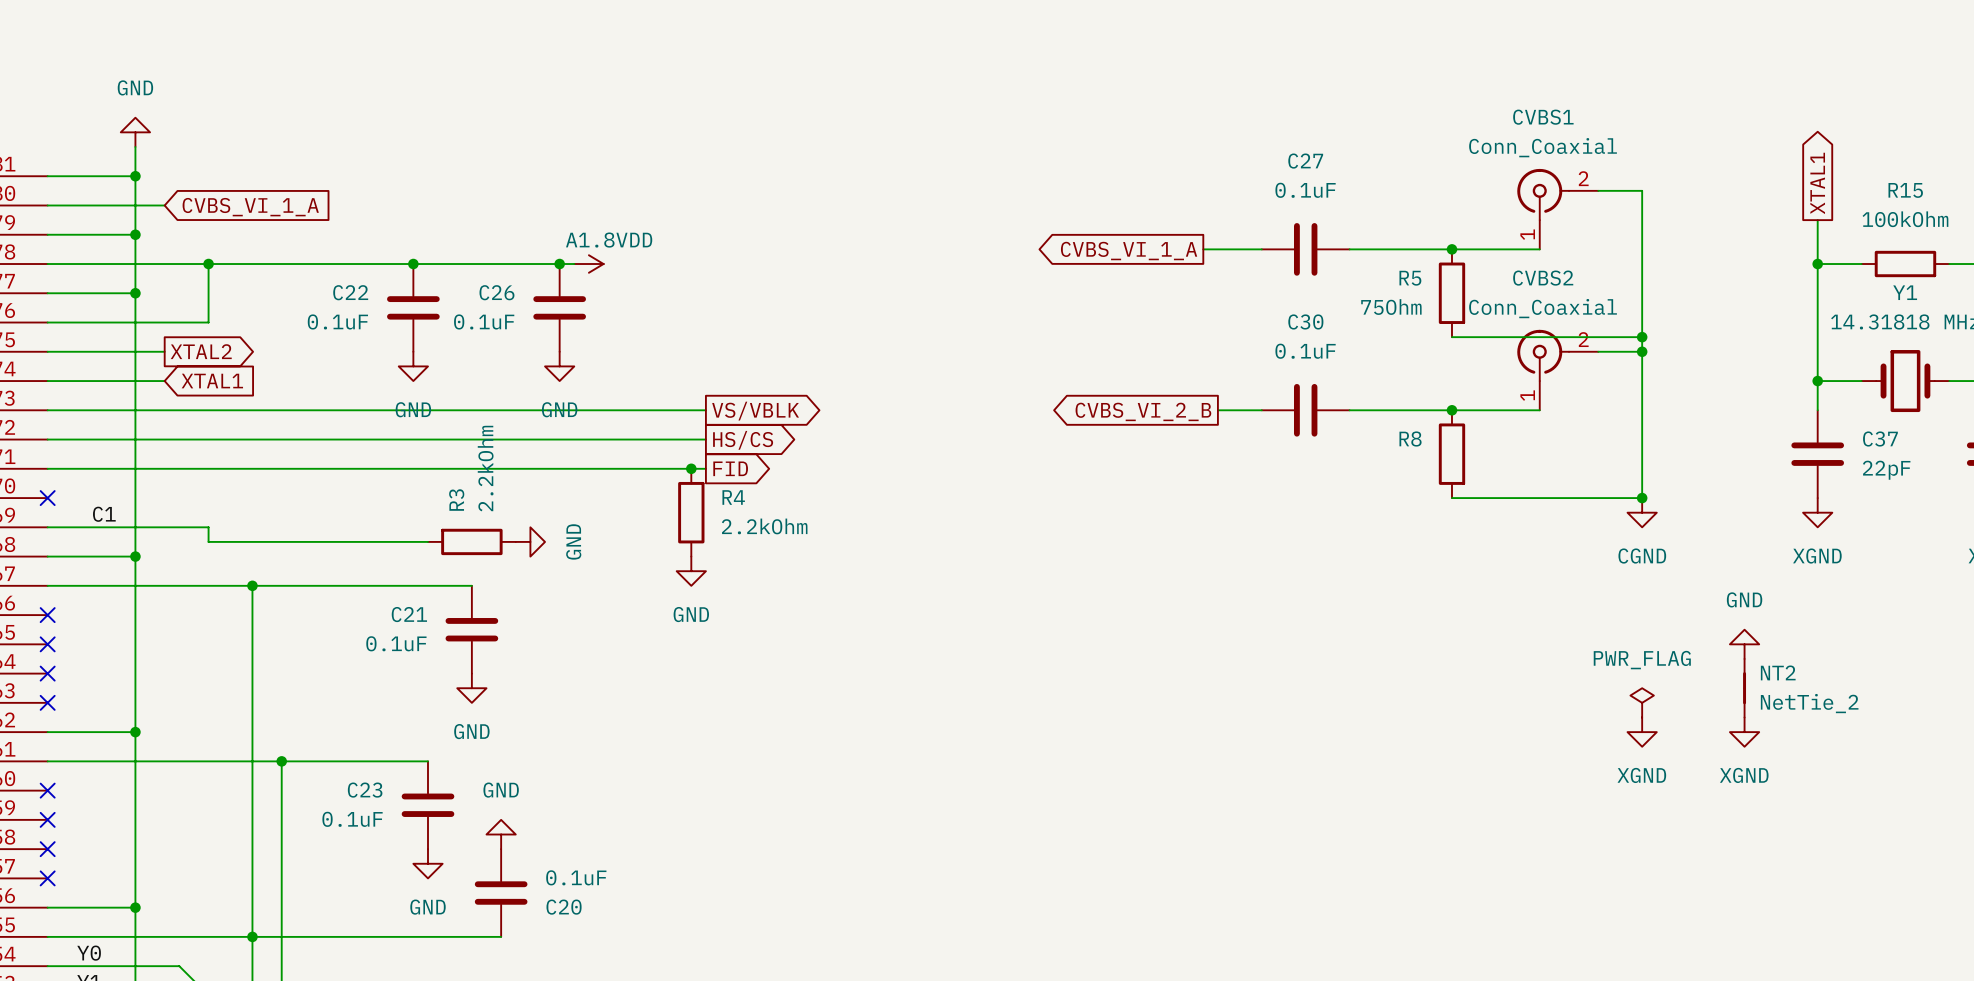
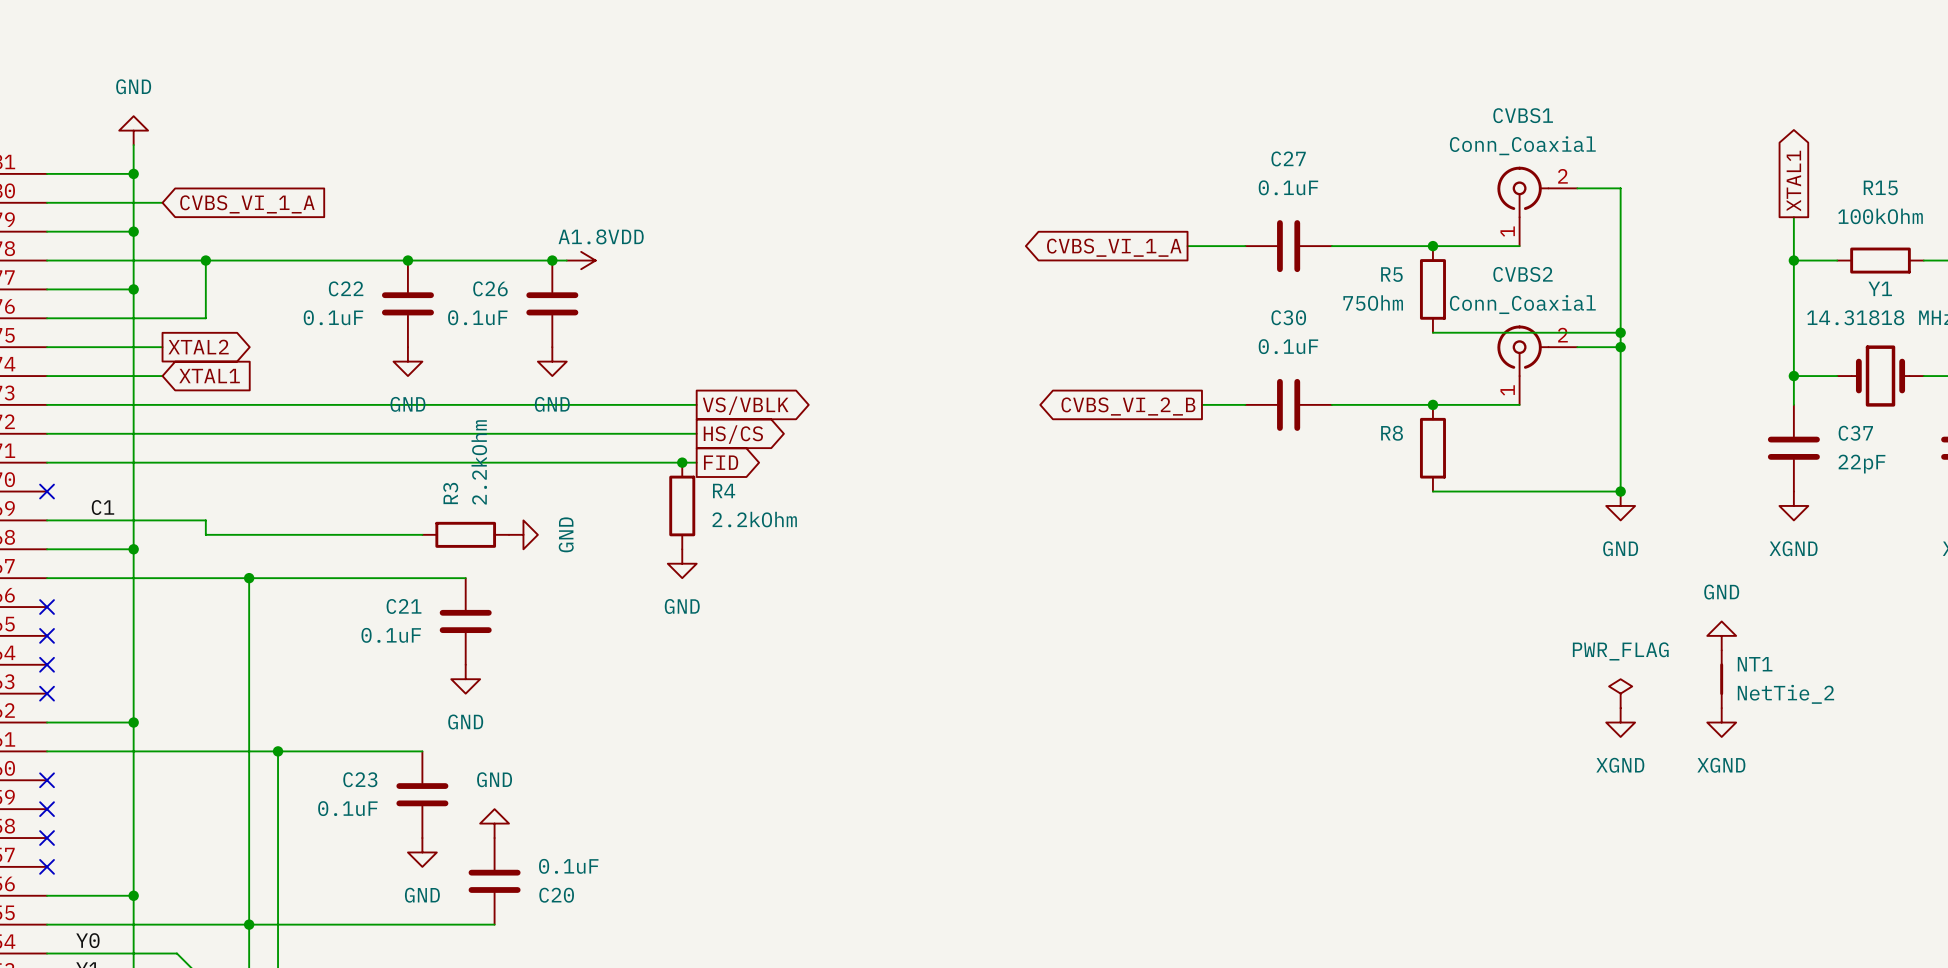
power symbol: CGND (1642, 512) -> GND (1620, 505)
NT2 name: NT2 (1778, 672) -> NT1 (1755, 664)

